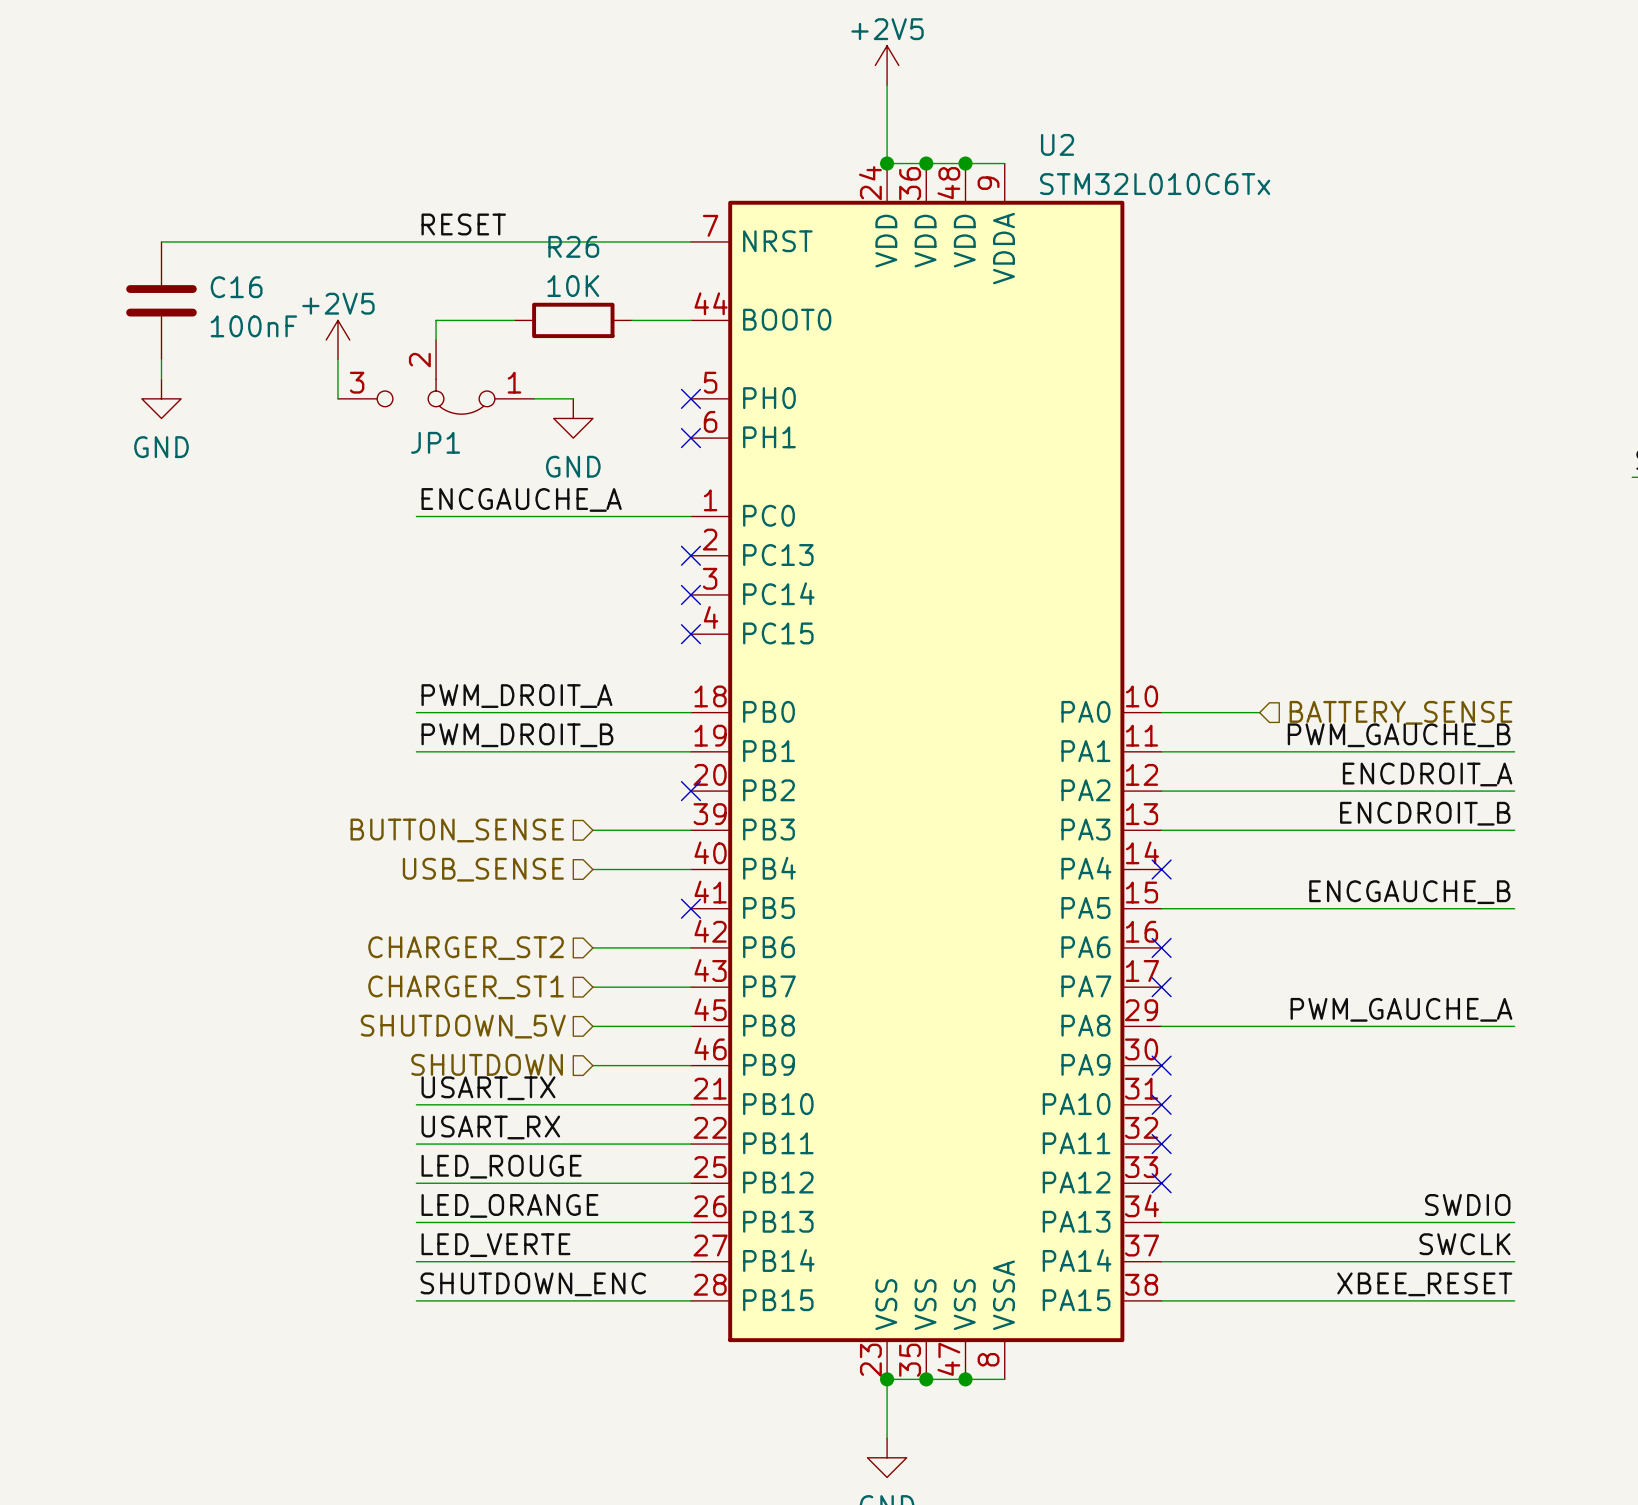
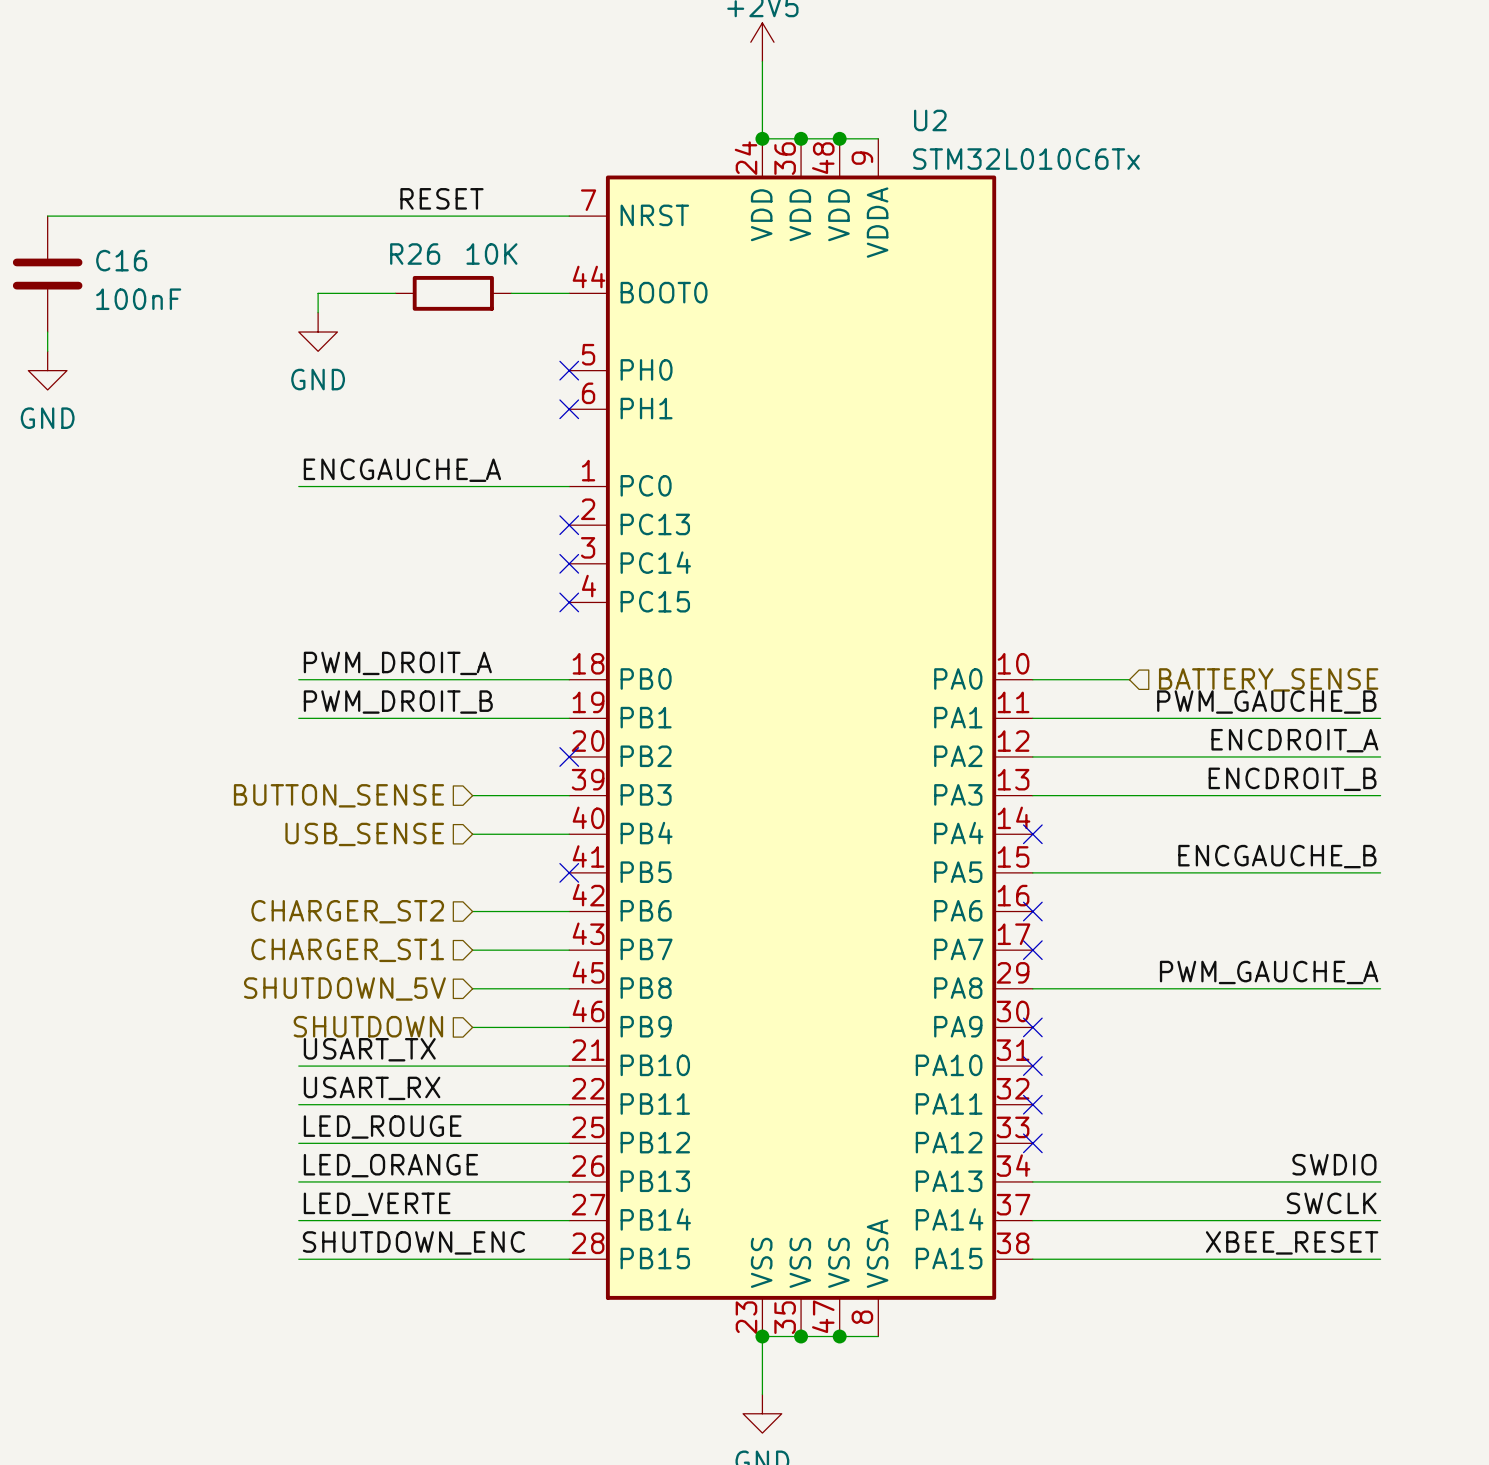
label position: RESET (463, 224) -> RESET (441, 198)
R26 name position: R26 (573, 246) -> R26 (415, 254)
R26 value position: 10K (573, 286) -> 10K (491, 254)
power symbol: +2V5 (337, 340) -> none
wire: (337, 359) (337, 398) -> none
JP1: (436, 377) -> none
wire: (534, 398) (573, 398) -> none
power symbol position: GND (573, 418) -> GND (318, 332)

